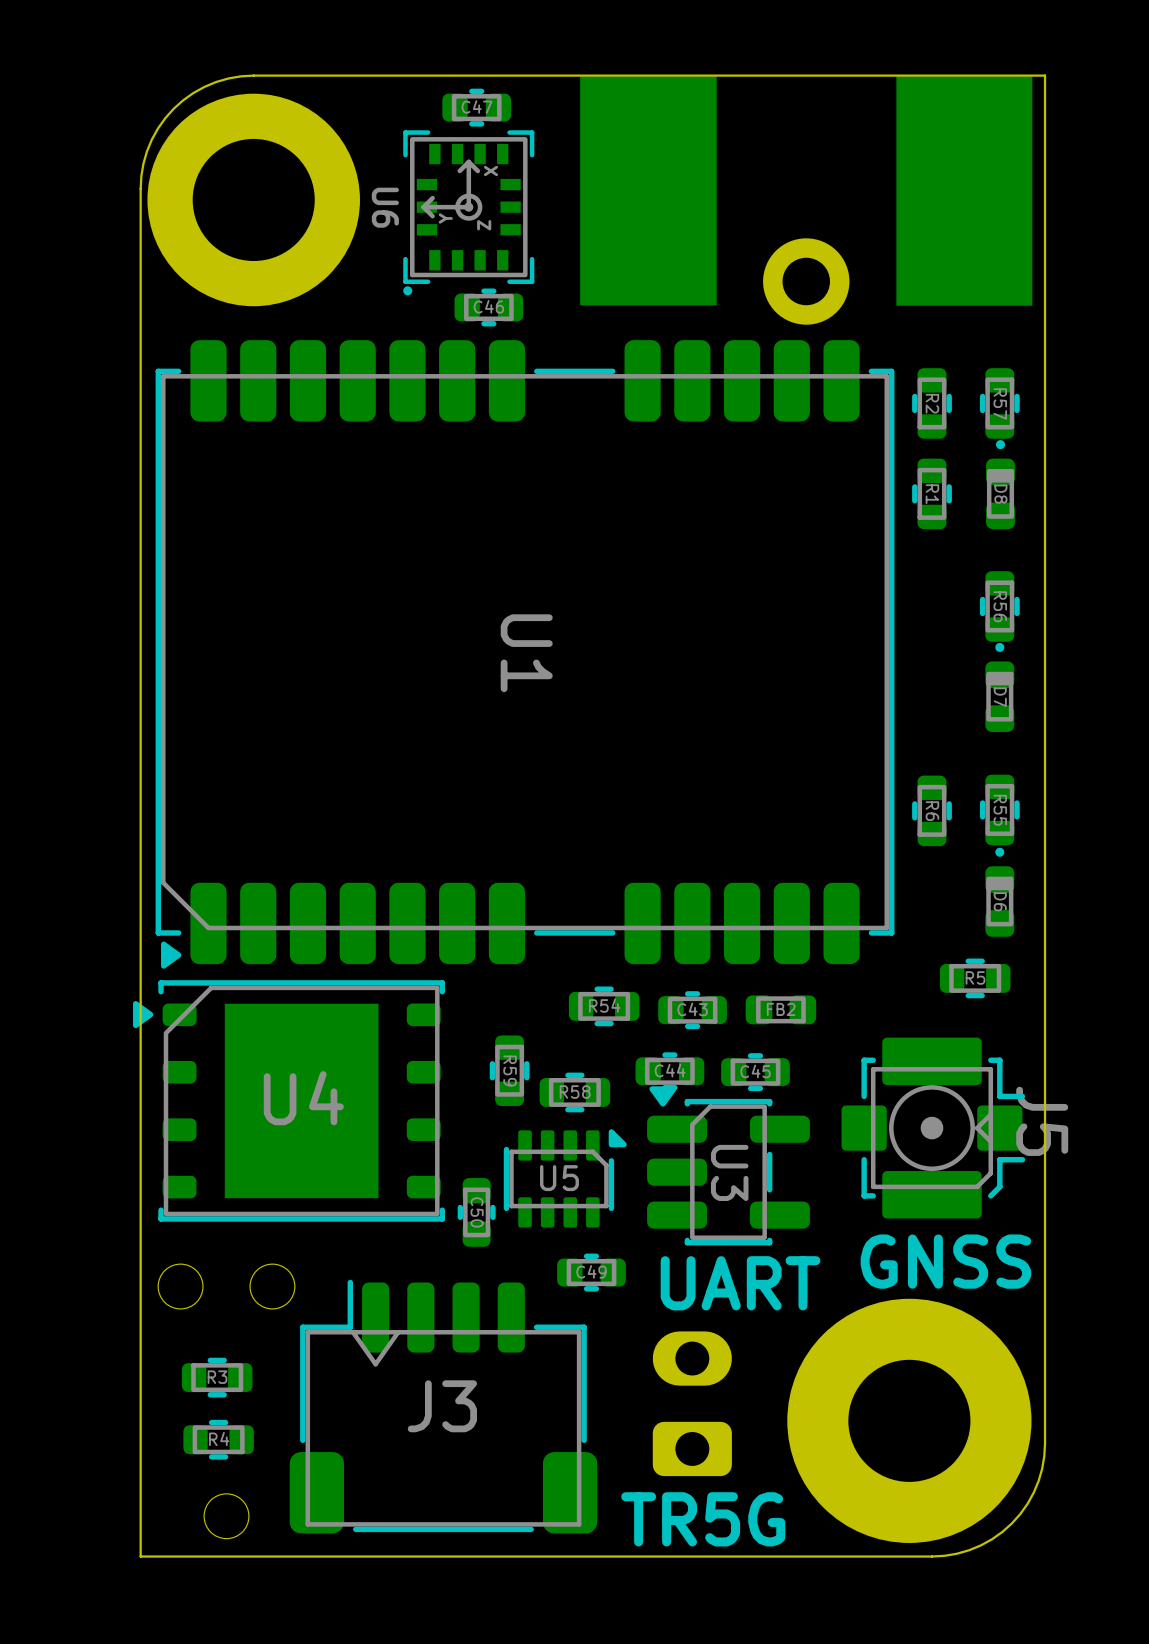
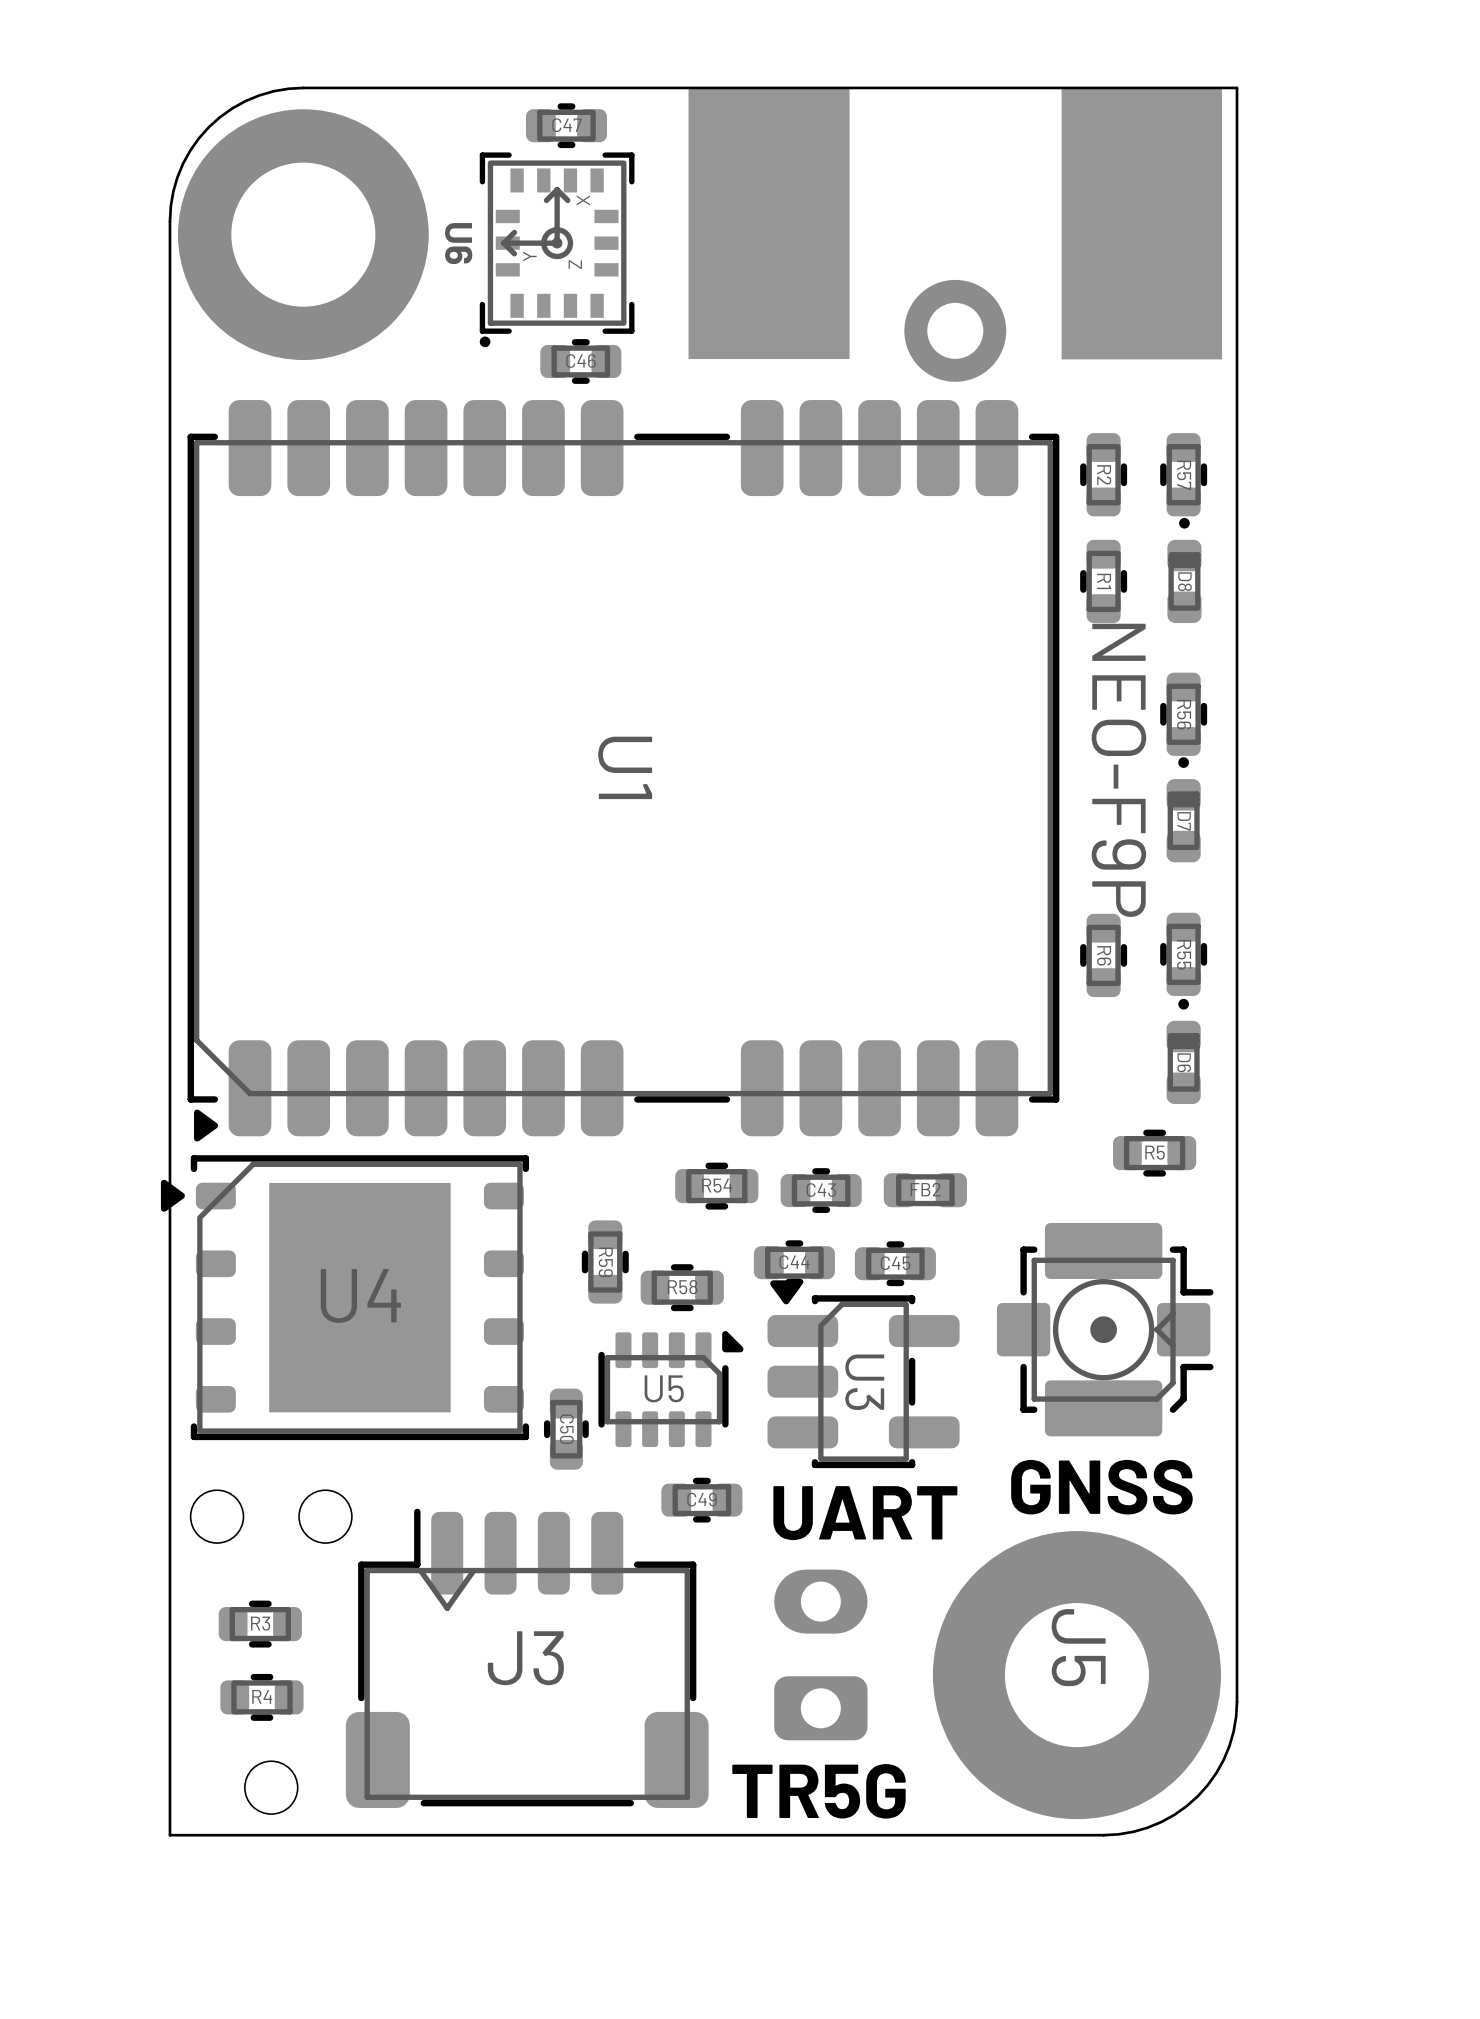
U1 value: none -> NEO-F9P (1118, 770)
J5 name position: J5 (1042, 1121) -> J5 (1078, 1647)

